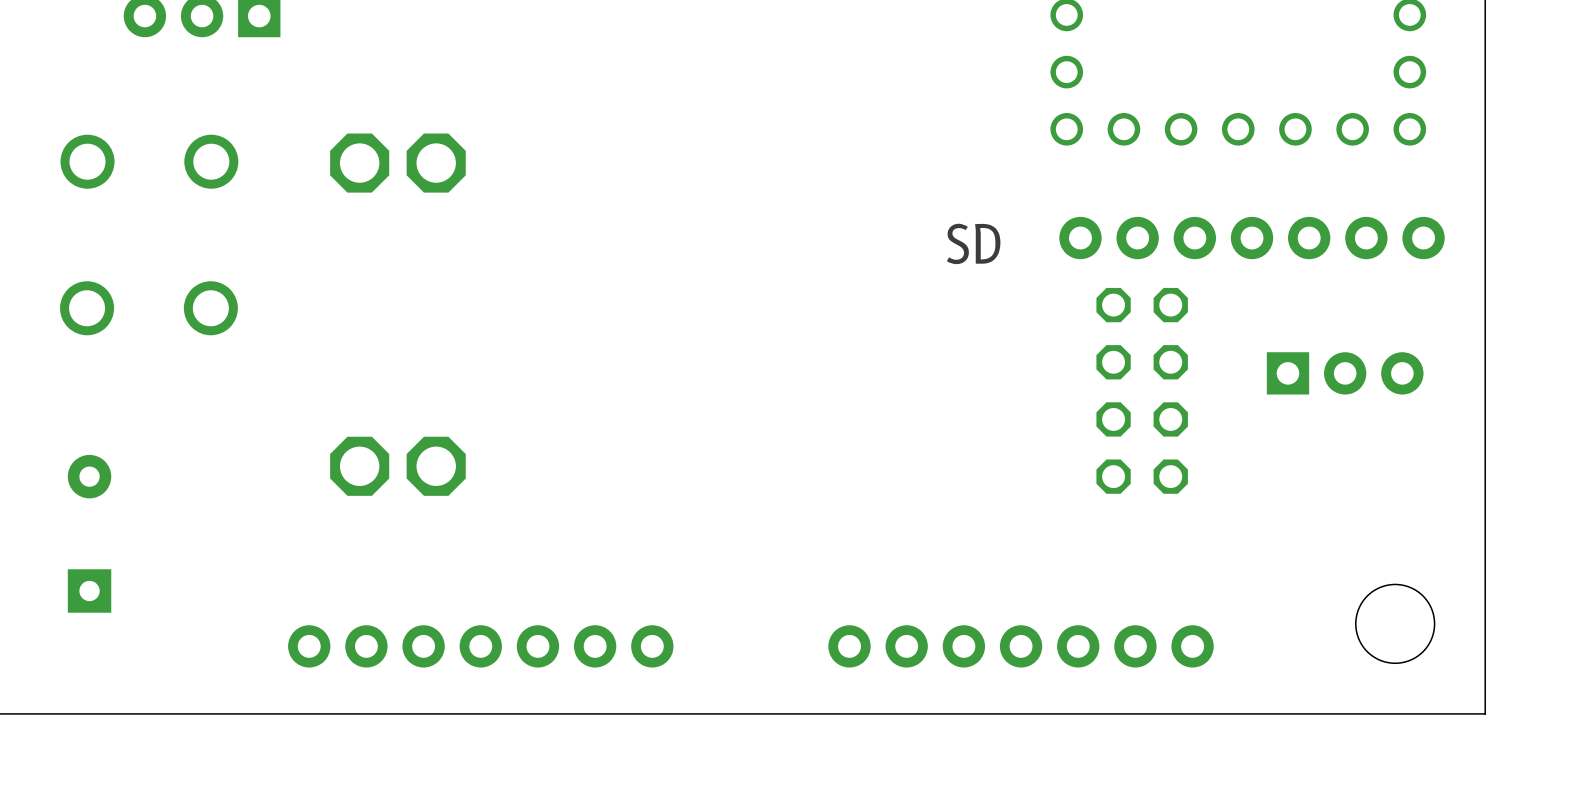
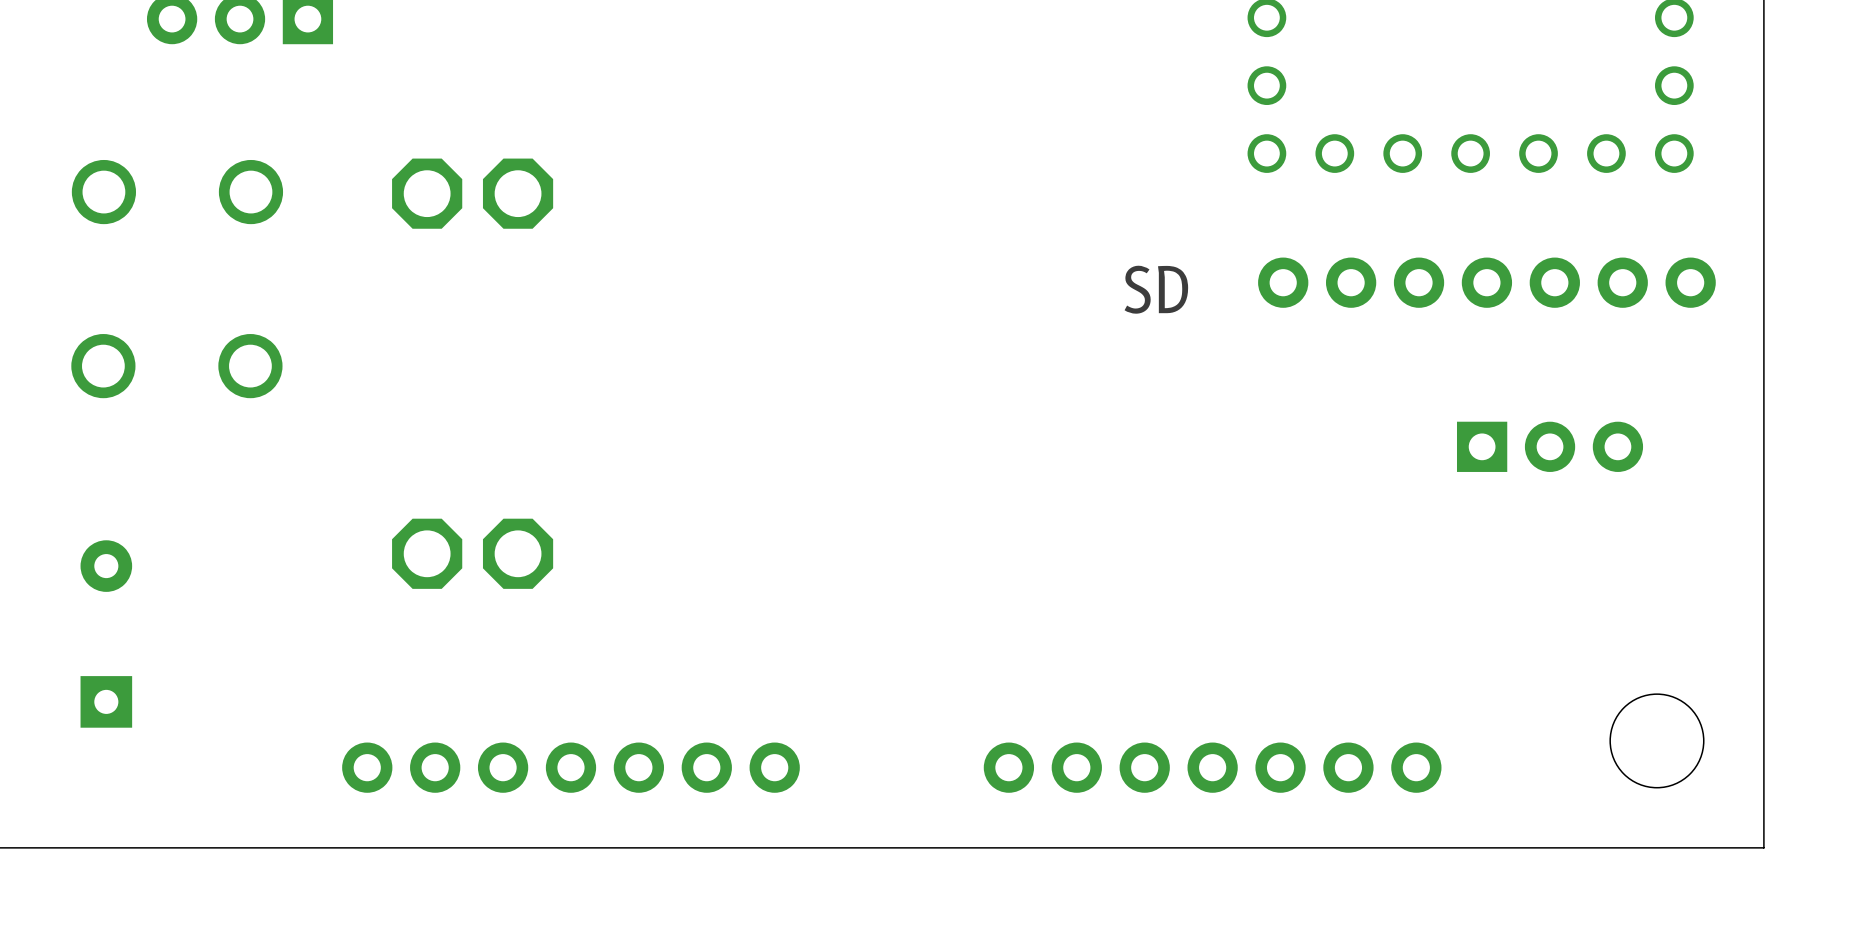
part position: (1345, 373) -> (1550, 446)
part: (1142, 390) -> none

